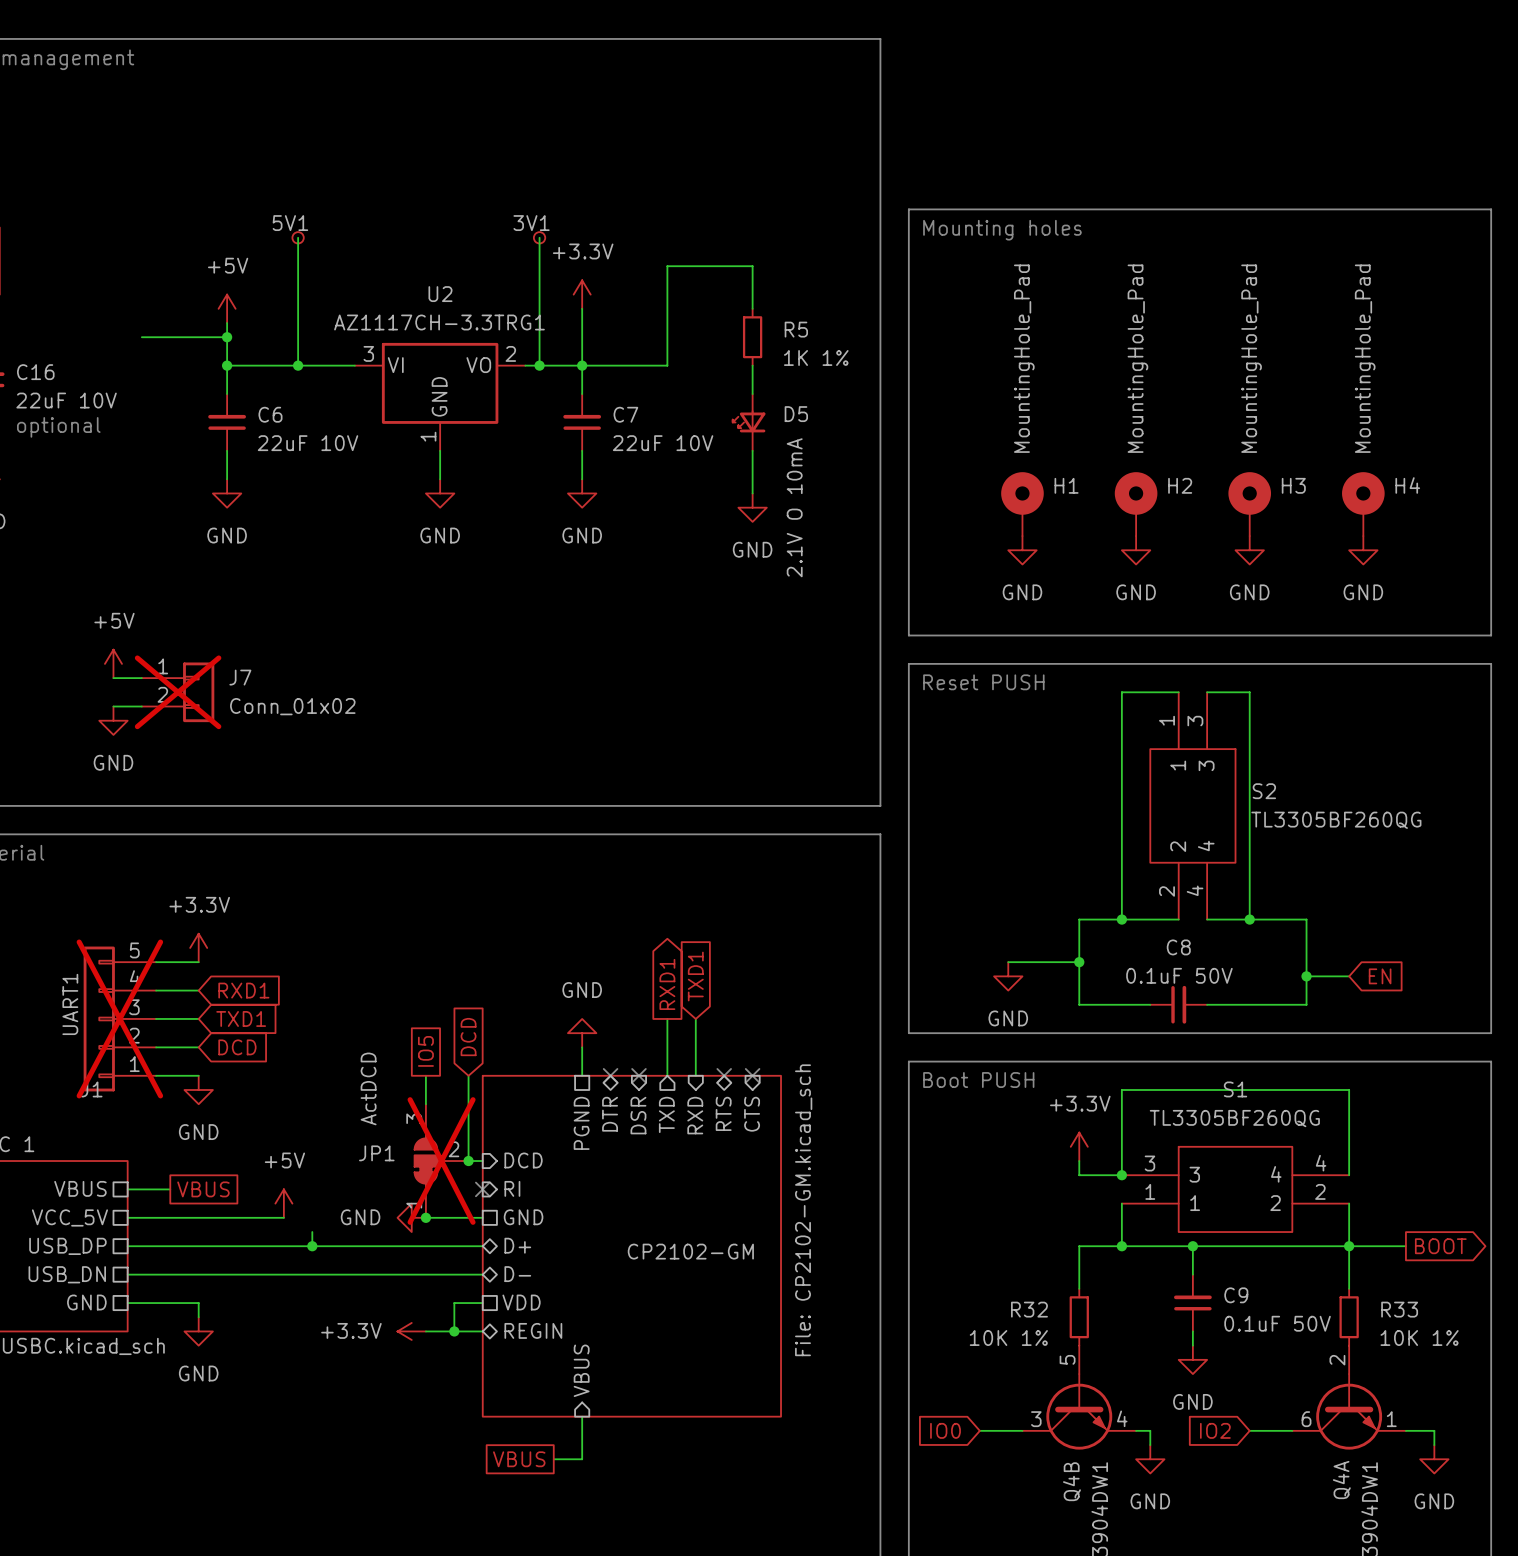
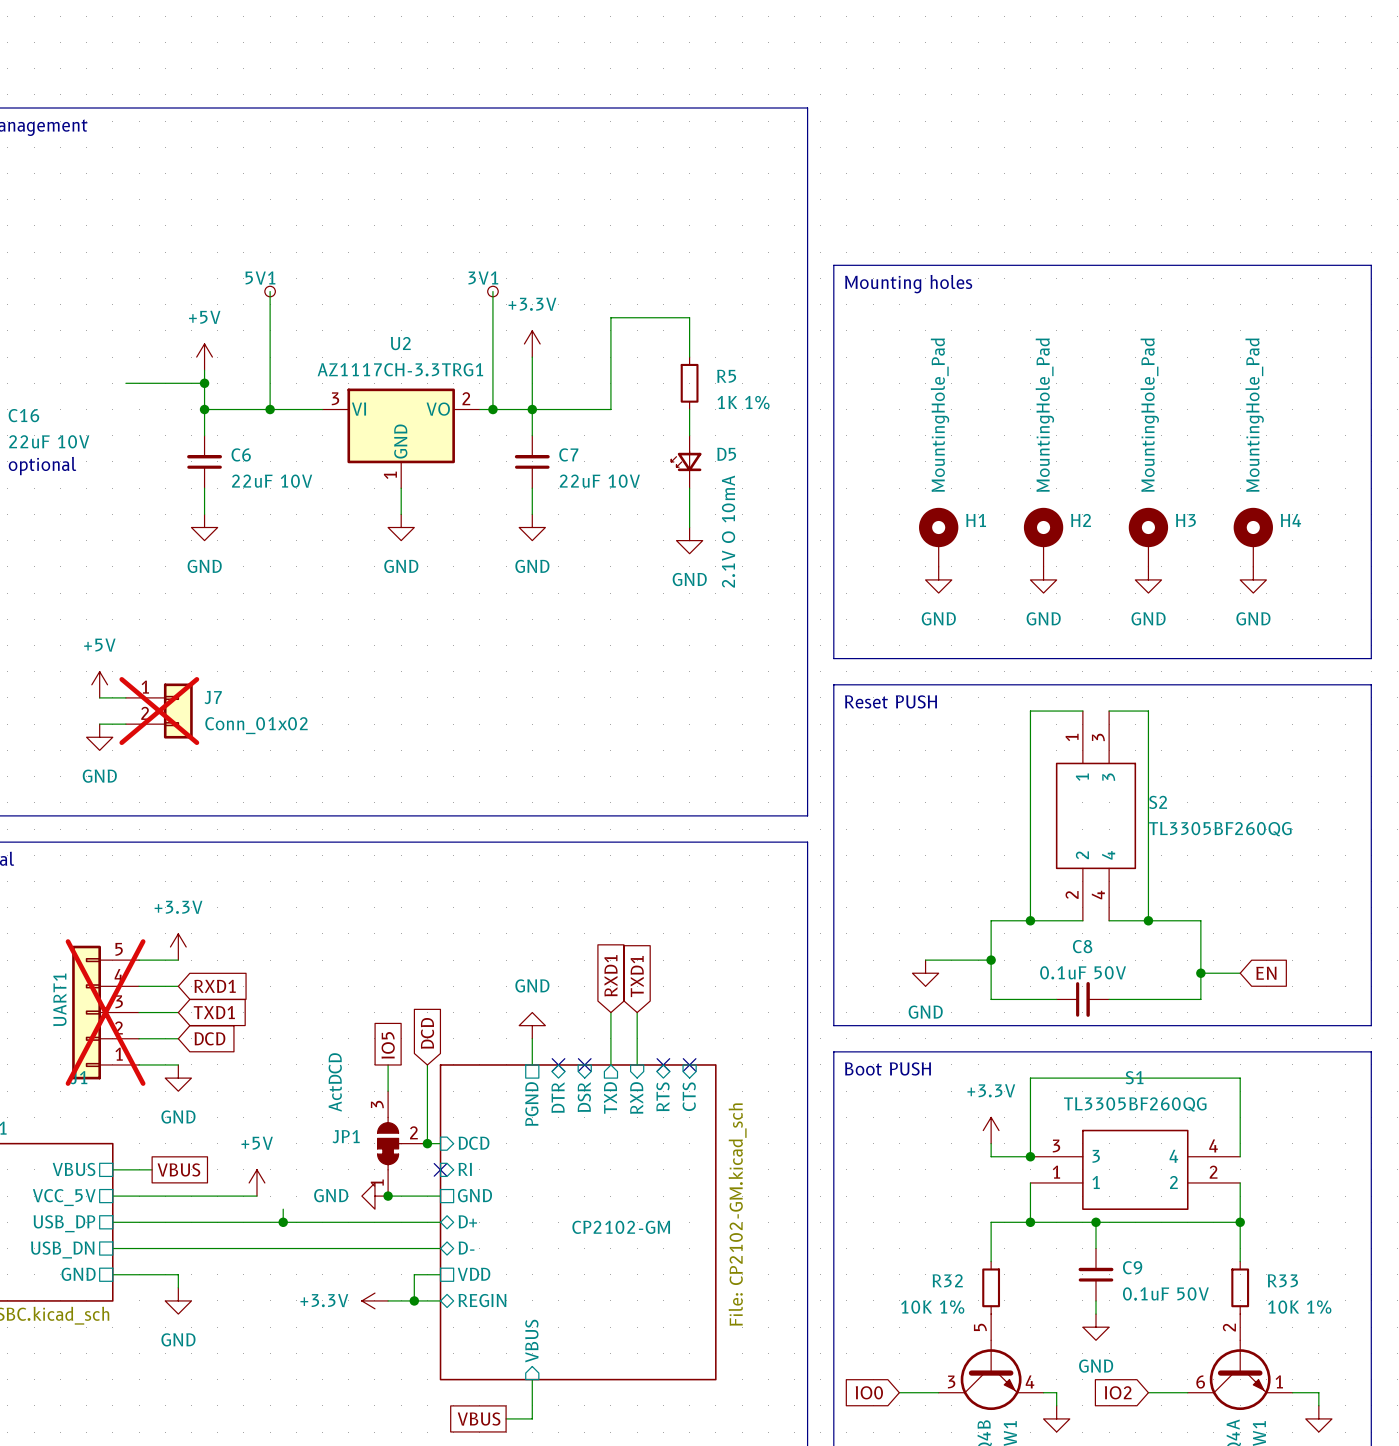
global label shape: output (667, 984) -> input (610, 975)
JP1 do-not-place cross: (441, 1161) -> none
wire: (1349, 1246) (1405, 1246) -> none
global label: BOOT (1440, 1246) -> none

